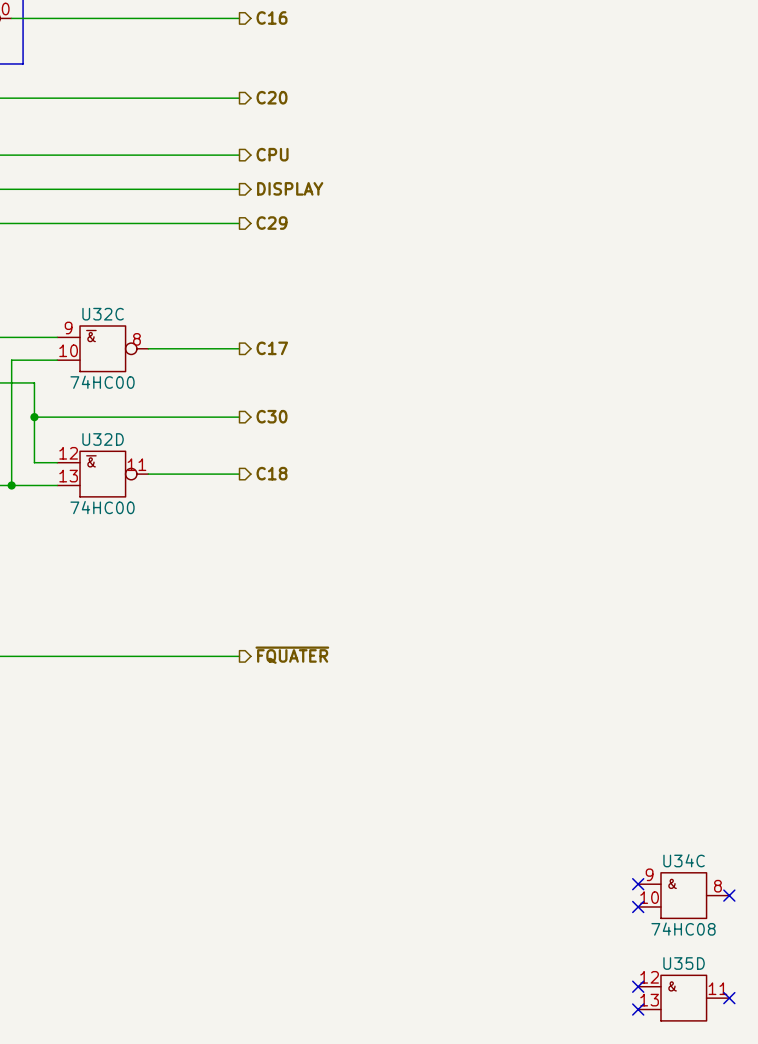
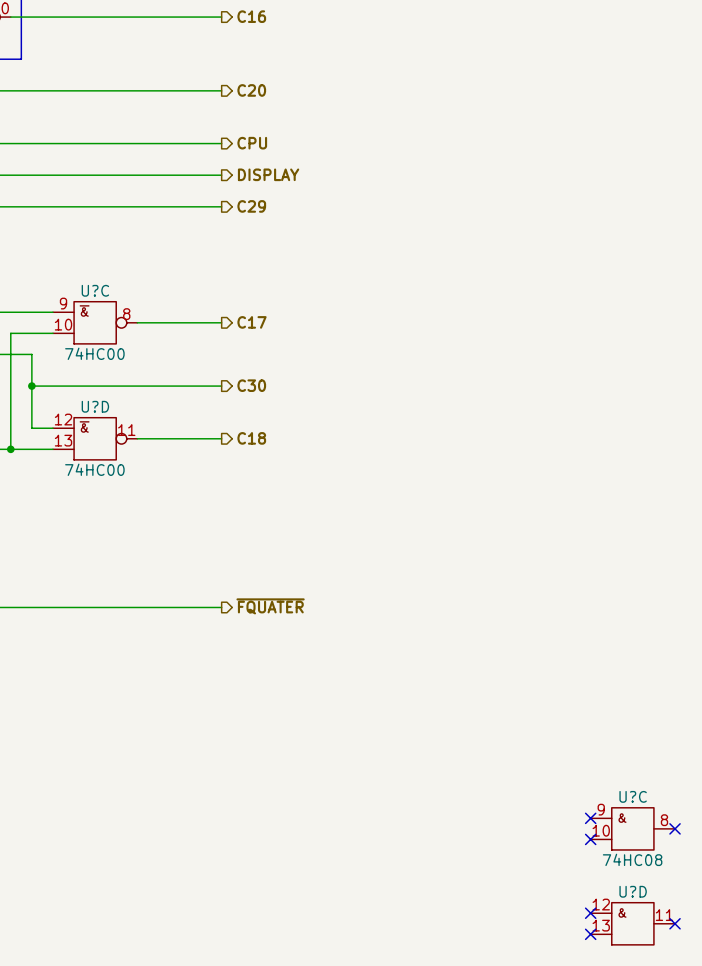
U32C name: U32C (103, 314) -> U?C (95, 290)
U32D name: U32D (103, 439) -> U?D (95, 406)
U34C name: U34C (684, 860) -> U?C (633, 796)
U35D name: U35D (684, 963) -> U?D (633, 891)

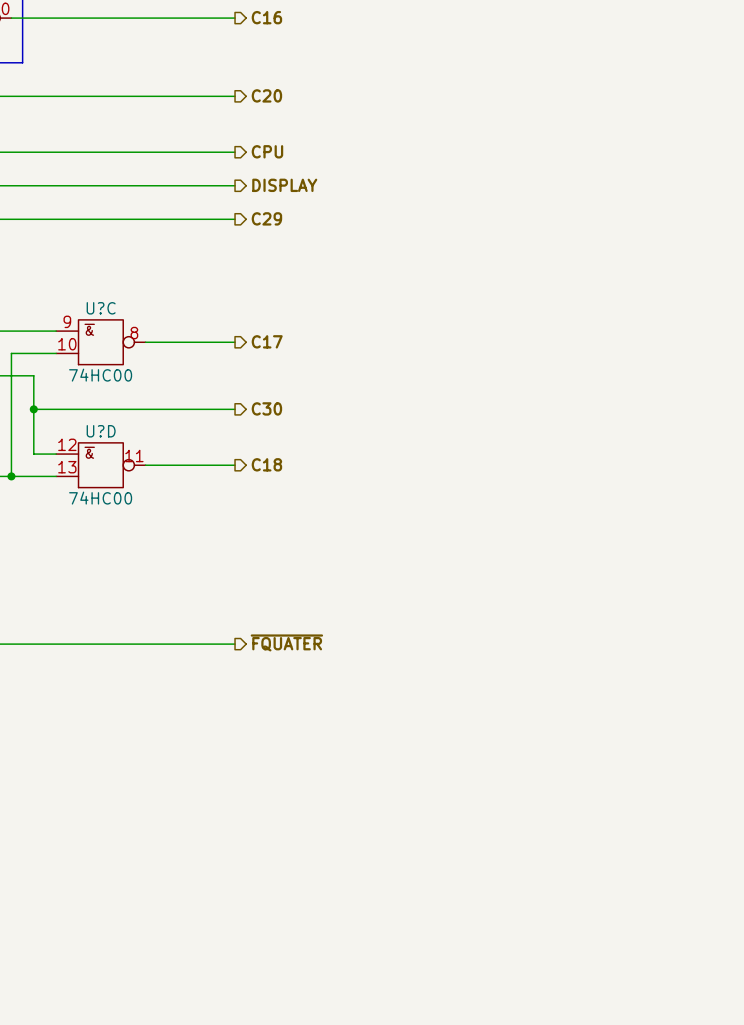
no-connect mark: (590, 818) -> none
U?C: 74HC08 (632, 828) -> none
no-connect mark: (675, 828) -> none
no-connect mark: (590, 839) -> none
no-connect mark: (590, 913) -> none
U?D: (632, 923) -> none
no-connect mark: (675, 923) -> none
no-connect mark: (590, 934) -> none

